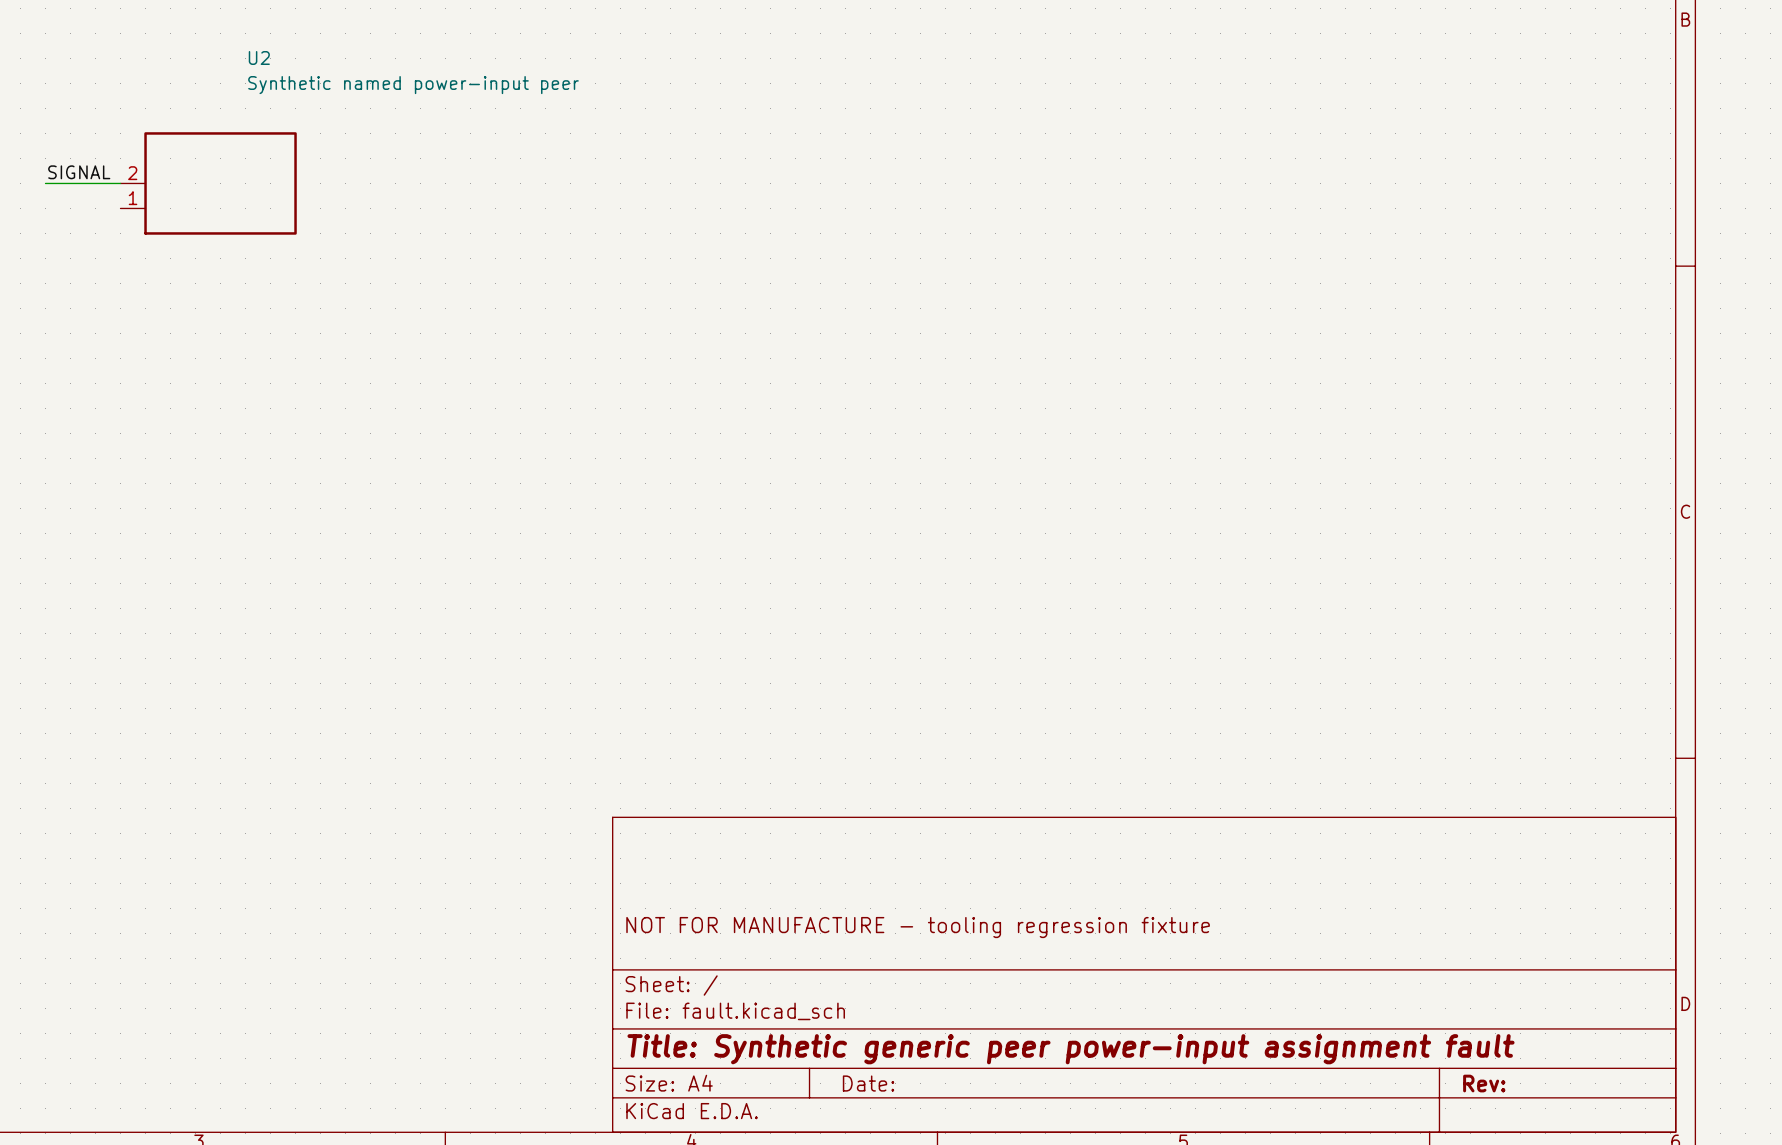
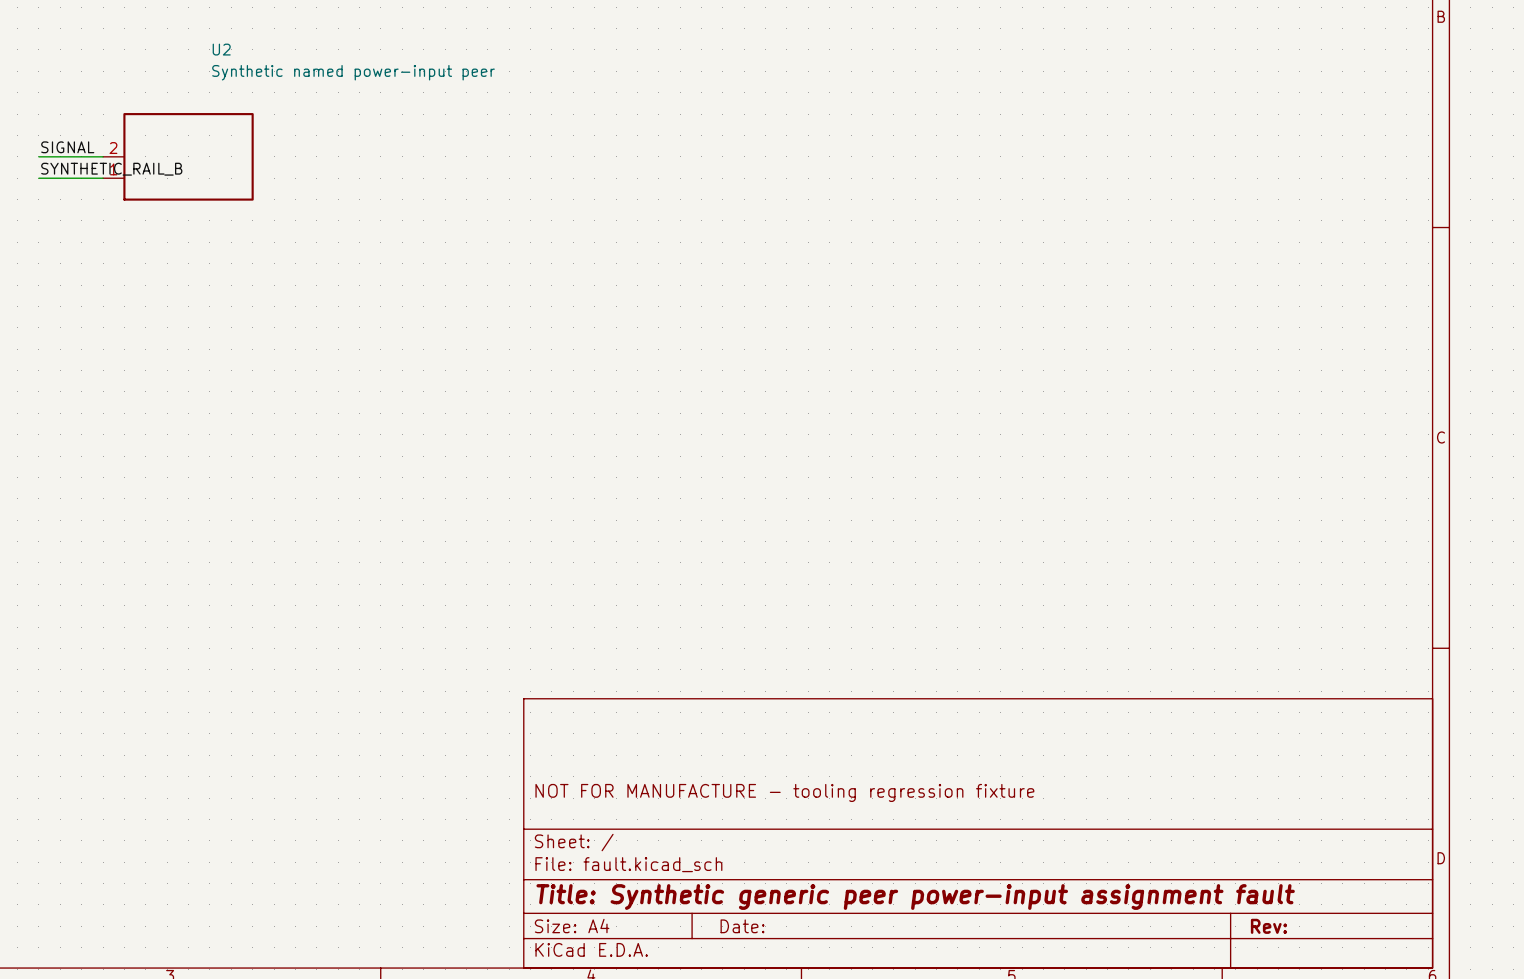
label: none -> SYNTHETIC_RAIL_B (111, 169)
wire: none -> (38, 178) (103, 178)

